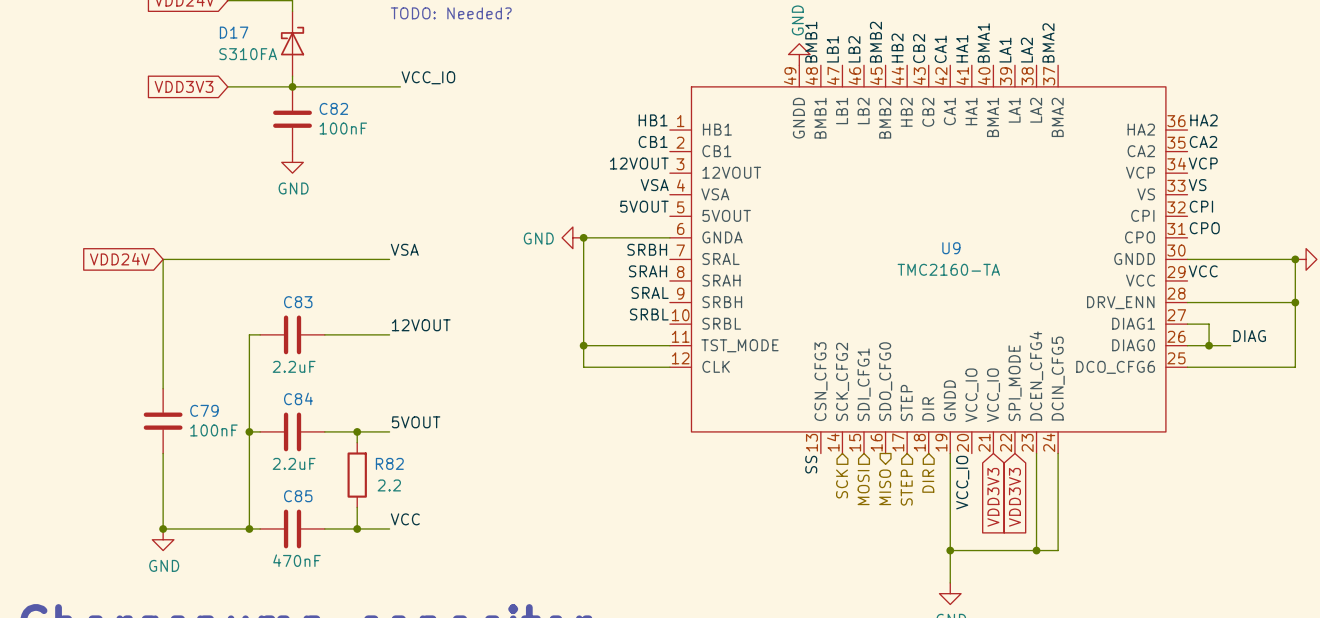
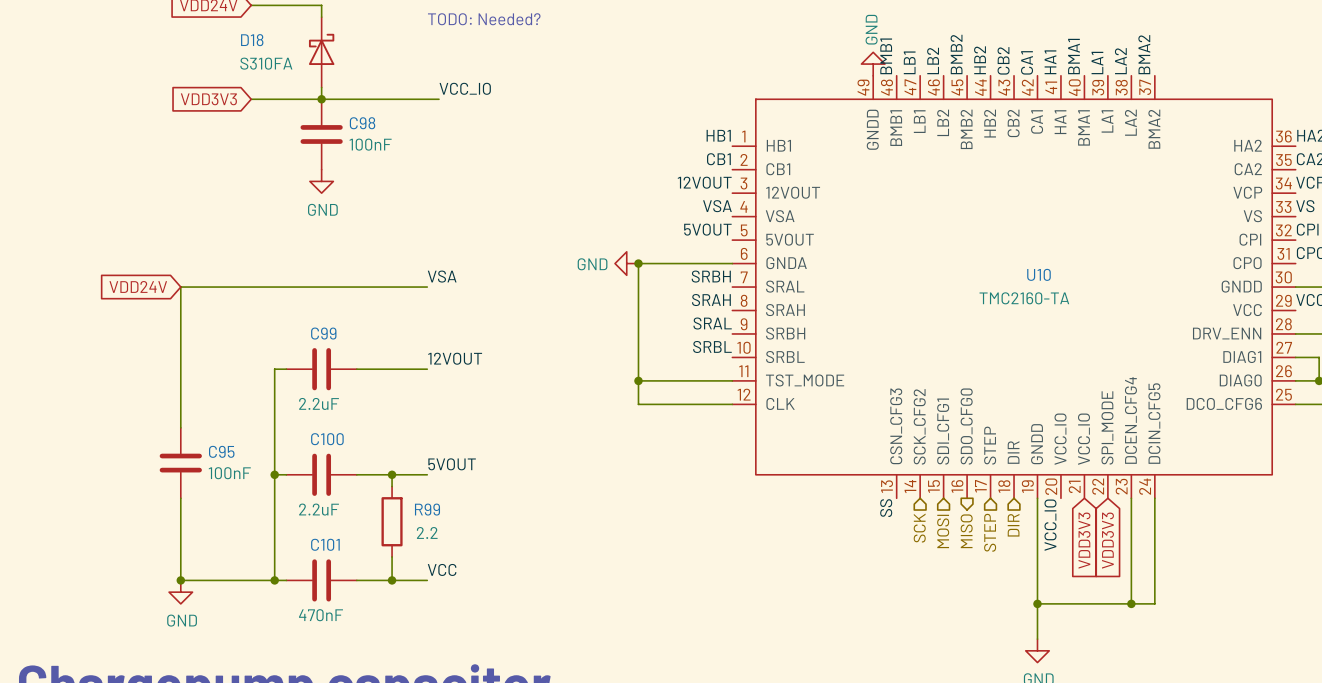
D17 name: D17 (234, 32) -> D18 (252, 40)
C82 name: C82 (333, 108) -> C98 (362, 123)
U9 name: U9 (951, 248) -> U10 (1038, 274)
C83 name: C83 (298, 302) -> C99 (323, 333)
C84 name: C84 (298, 398) -> C100 (327, 439)
C79 name: C79 (204, 410) -> C95 (221, 451)
R82 name: R82 (389, 463) -> R99 (427, 509)
C85 name: C85 (298, 496) -> C101 (325, 544)

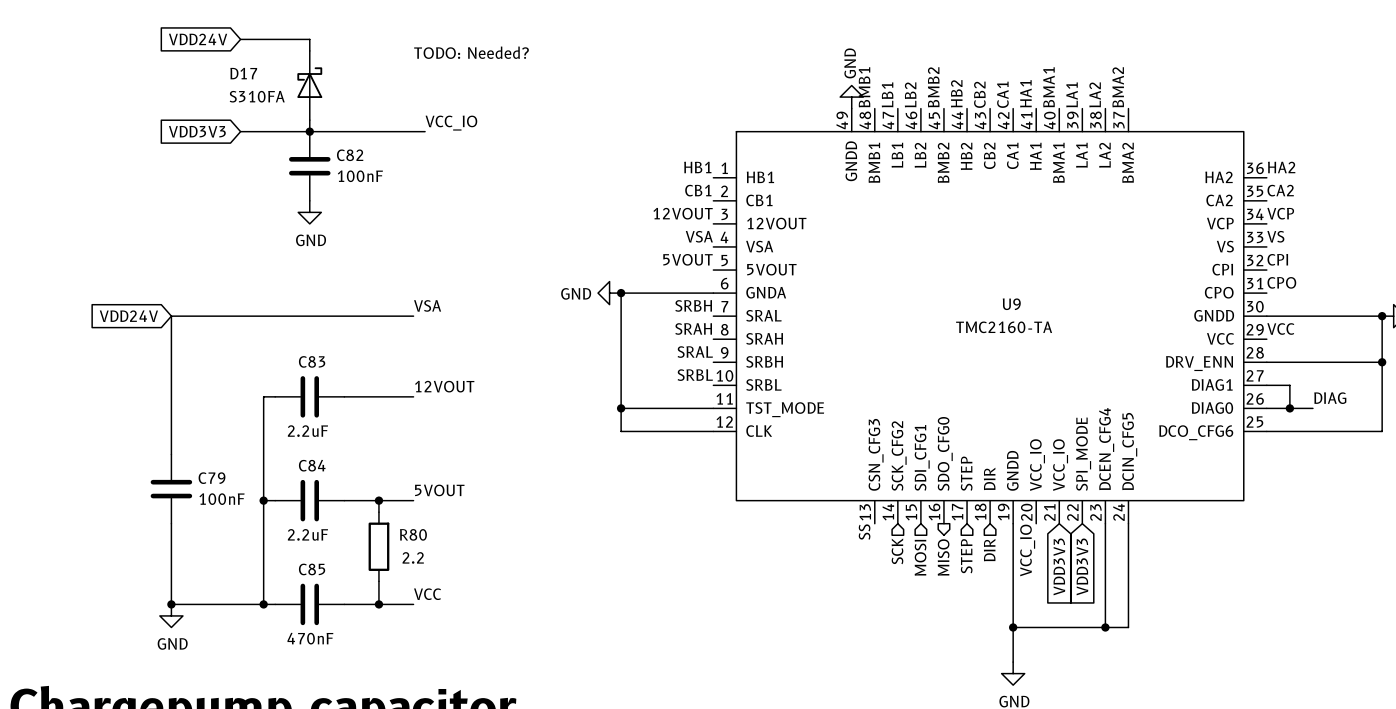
D18 name: D18 (252, 40) -> D17 (243, 73)
C98 name: C98 (362, 123) -> C82 (350, 155)
U10 name: U10 (1038, 274) -> U9 (1011, 304)
C99 name: C99 (323, 333) -> C83 (312, 361)
C100 name: C100 (327, 439) -> C84 (312, 465)
C95 name: C95 (221, 451) -> C79 (212, 478)
R99 name: R99 (427, 509) -> R80 (413, 534)
C101 name: C101 (325, 544) -> C85 (312, 569)

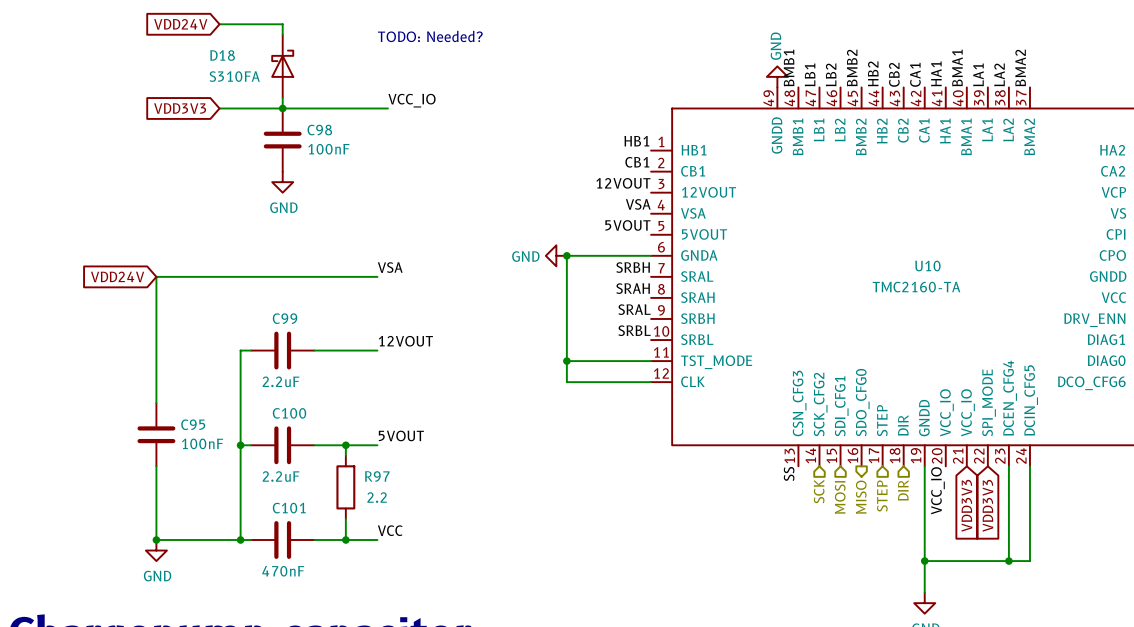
D17 name: D17 (243, 73) -> D18 (222, 55)
C82 name: C82 (350, 155) -> C98 (319, 130)
U9 name: U9 (1011, 304) -> U10 (927, 266)
C83 name: C83 (312, 361) -> C99 (285, 318)
C84 name: C84 (312, 465) -> C100 (289, 413)
C79 name: C79 (212, 478) -> C95 (193, 424)
R80 name: R80 (413, 534) -> R97 (377, 476)
C85 name: C85 (312, 569) -> C101 (289, 508)

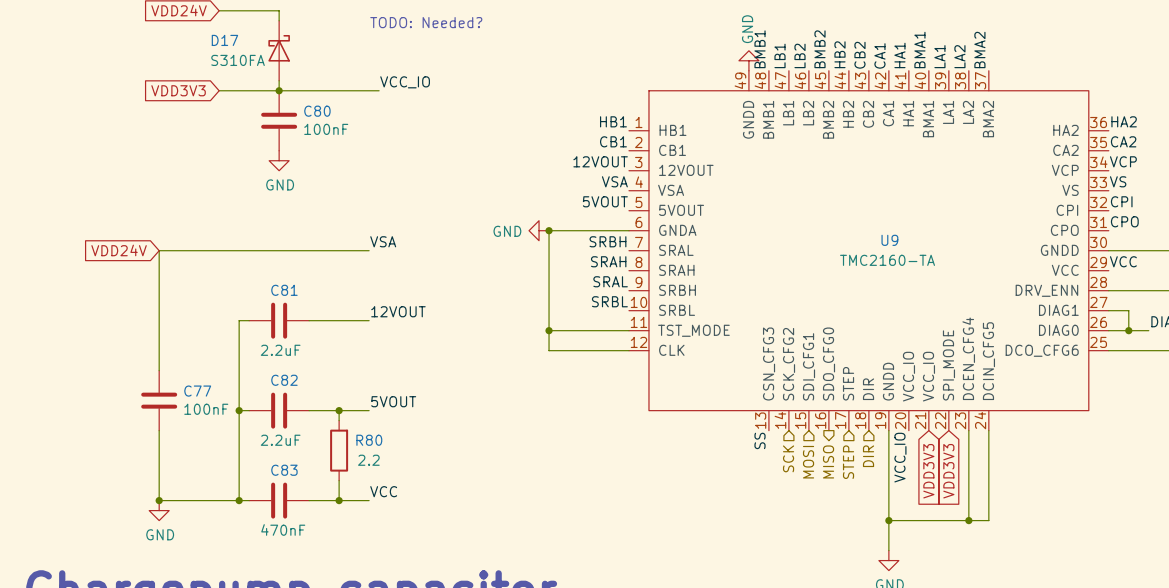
D18 name: D18 (222, 55) -> D17 (224, 40)
C98 name: C98 (319, 130) -> C80 (317, 111)
U10 name: U10 (927, 266) -> U9 (889, 240)
C99 name: C99 (285, 318) -> C81 (284, 290)
C100 name: C100 (289, 413) -> C82 (284, 380)
C95 name: C95 (193, 424) -> C77 (197, 391)
R97 name: R97 (377, 476) -> R80 (369, 440)
C101 name: C101 (289, 508) -> C83 (284, 470)

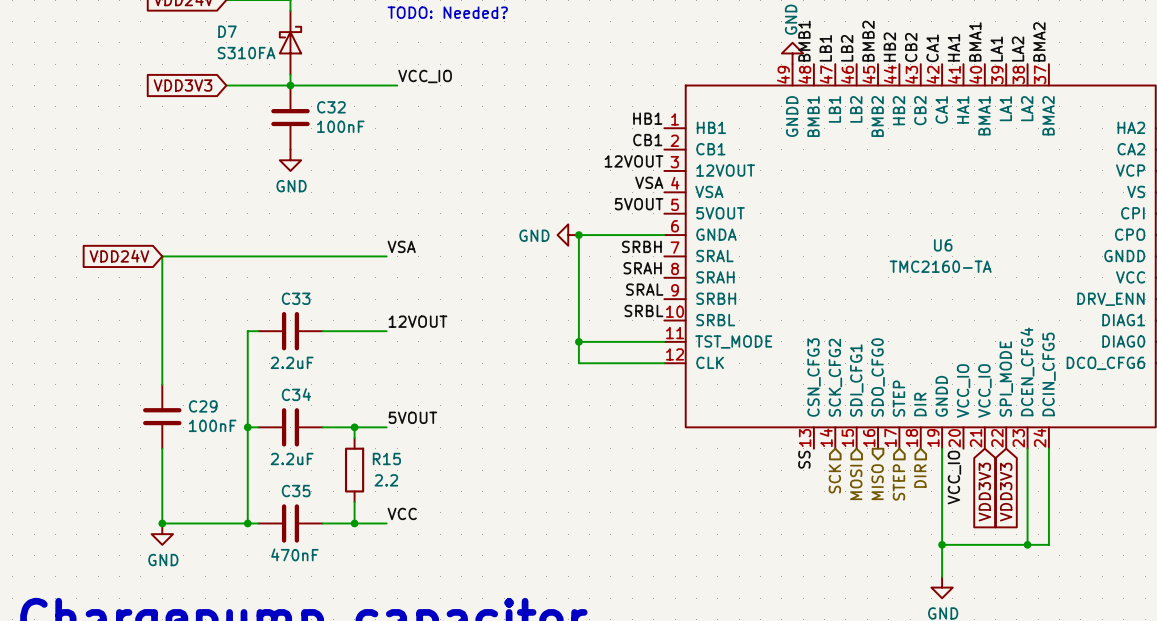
D17 name: D17 (224, 40) -> D7 (227, 31)
C80 name: C80 (317, 111) -> C32 (331, 107)
U9 name: U9 (889, 240) -> U6 (943, 245)
C81 name: C81 (284, 290) -> C33 (296, 298)
C82 name: C82 (284, 380) -> C34 (296, 394)
C77 name: C77 (197, 391) -> C29 (203, 406)
R80 name: R80 (369, 440) -> R15 (386, 458)
C83 name: C83 (284, 470) -> C35 (296, 491)

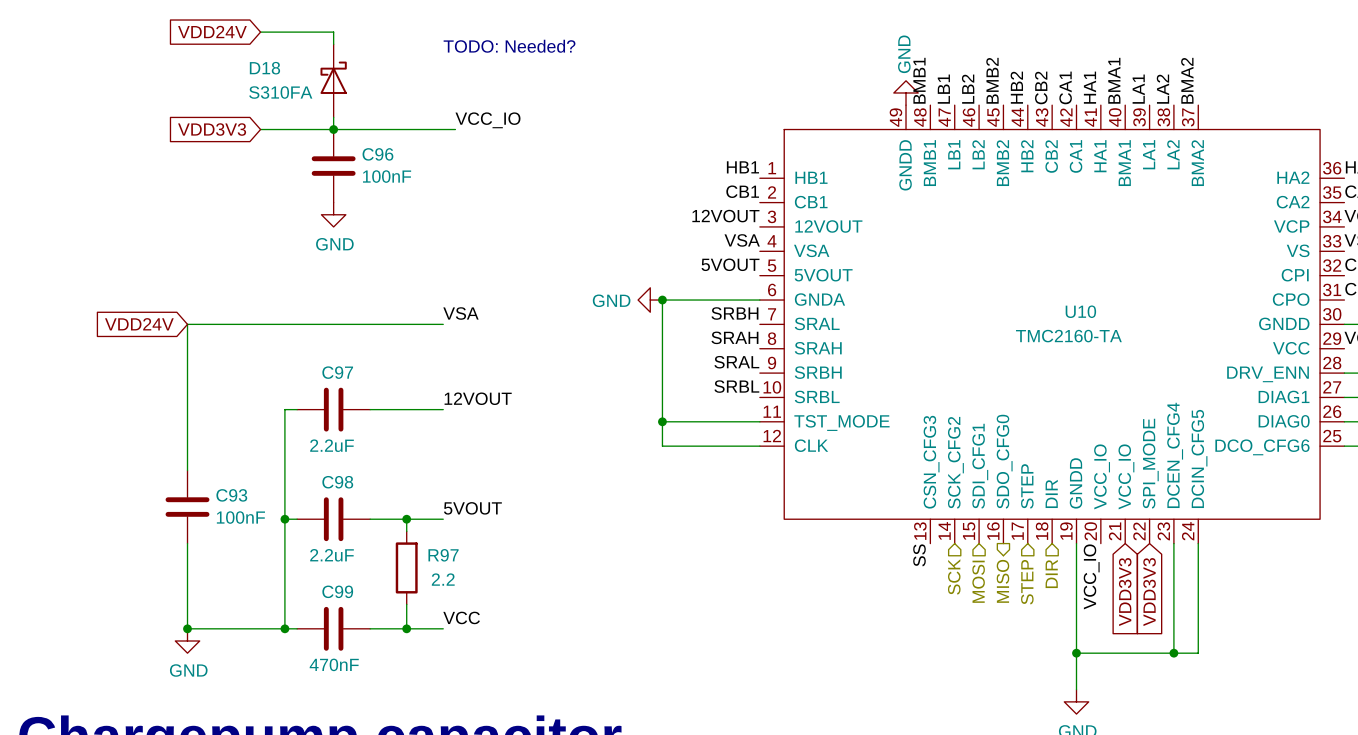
D7 name: D7 (227, 31) -> D18 (264, 68)
C32 name: C32 (331, 107) -> C96 (377, 154)
U6 name: U6 (943, 245) -> U10 (1080, 311)
C33 name: C33 (296, 298) -> C97 (337, 372)
C34 name: C34 (296, 394) -> C98 (337, 482)
C29 name: C29 (203, 406) -> C93 (231, 495)
R15 name: R15 (386, 458) -> R97 (443, 555)
C35 name: C35 (296, 491) -> C99 (337, 591)

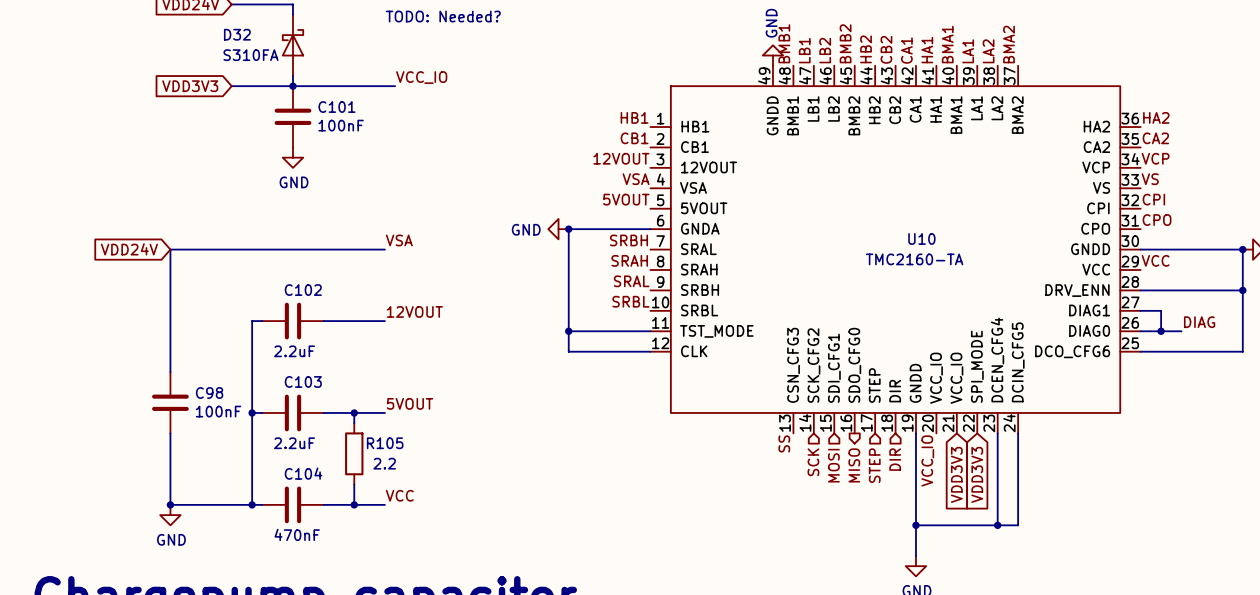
D18 name: D18 (264, 68) -> D32 (237, 34)
C96 name: C96 (377, 154) -> C101 (336, 107)
C97 name: C97 (337, 372) -> C102 (303, 290)
C98 name: C98 (337, 482) -> C103 (303, 381)
C93 name: C93 (231, 495) -> C98 (209, 392)
R97 name: R97 (443, 555) -> R105 (385, 443)
C99 name: C99 (337, 591) -> C104 (303, 473)

